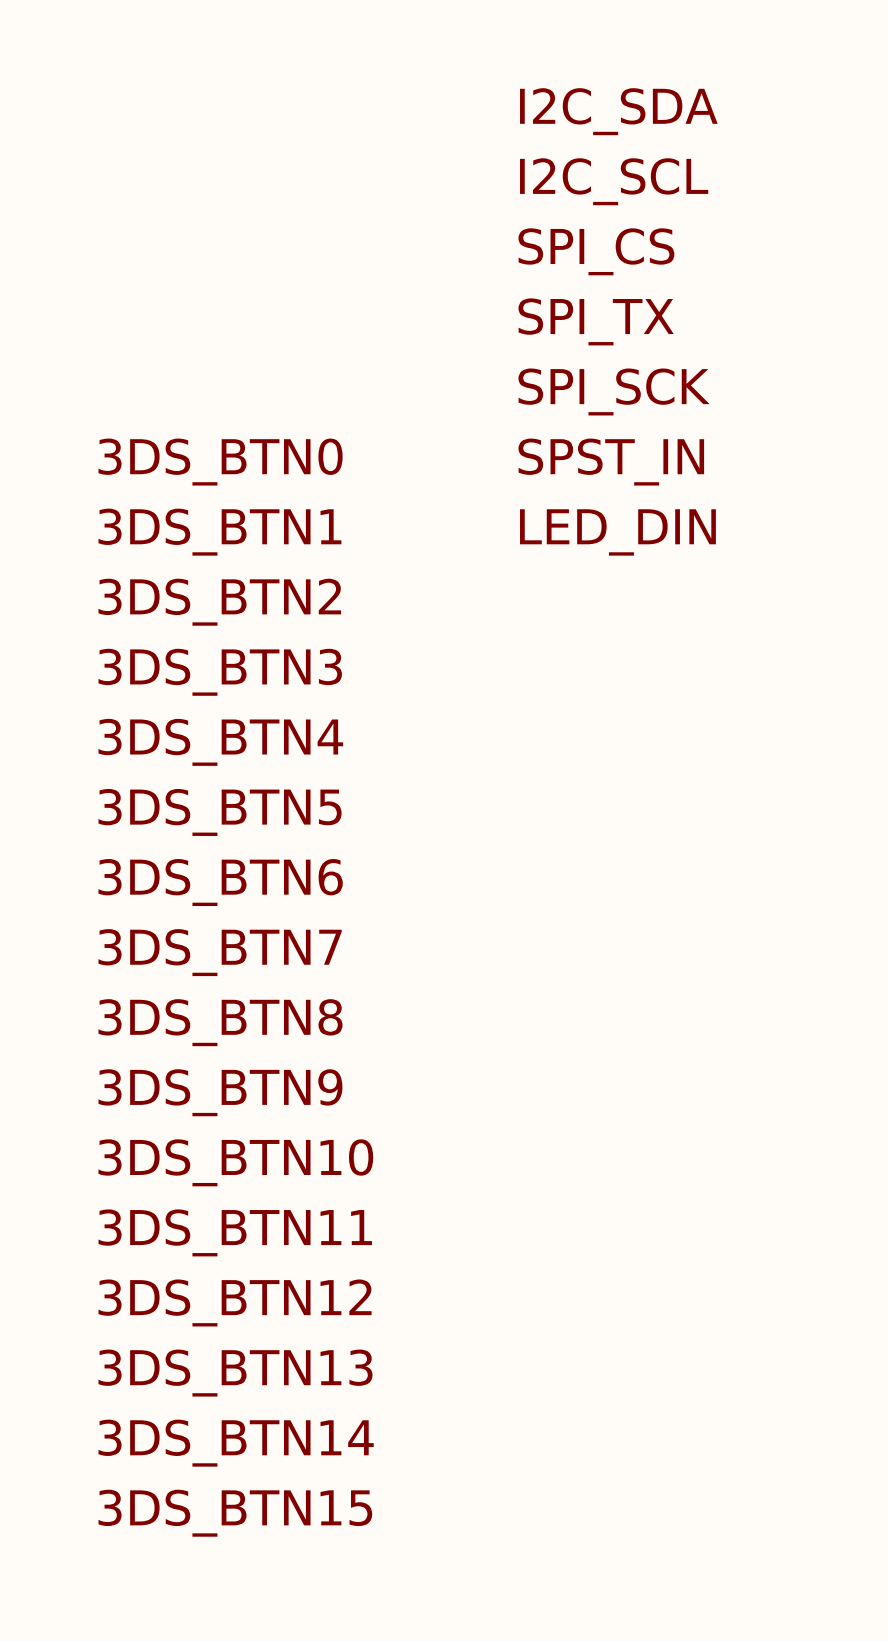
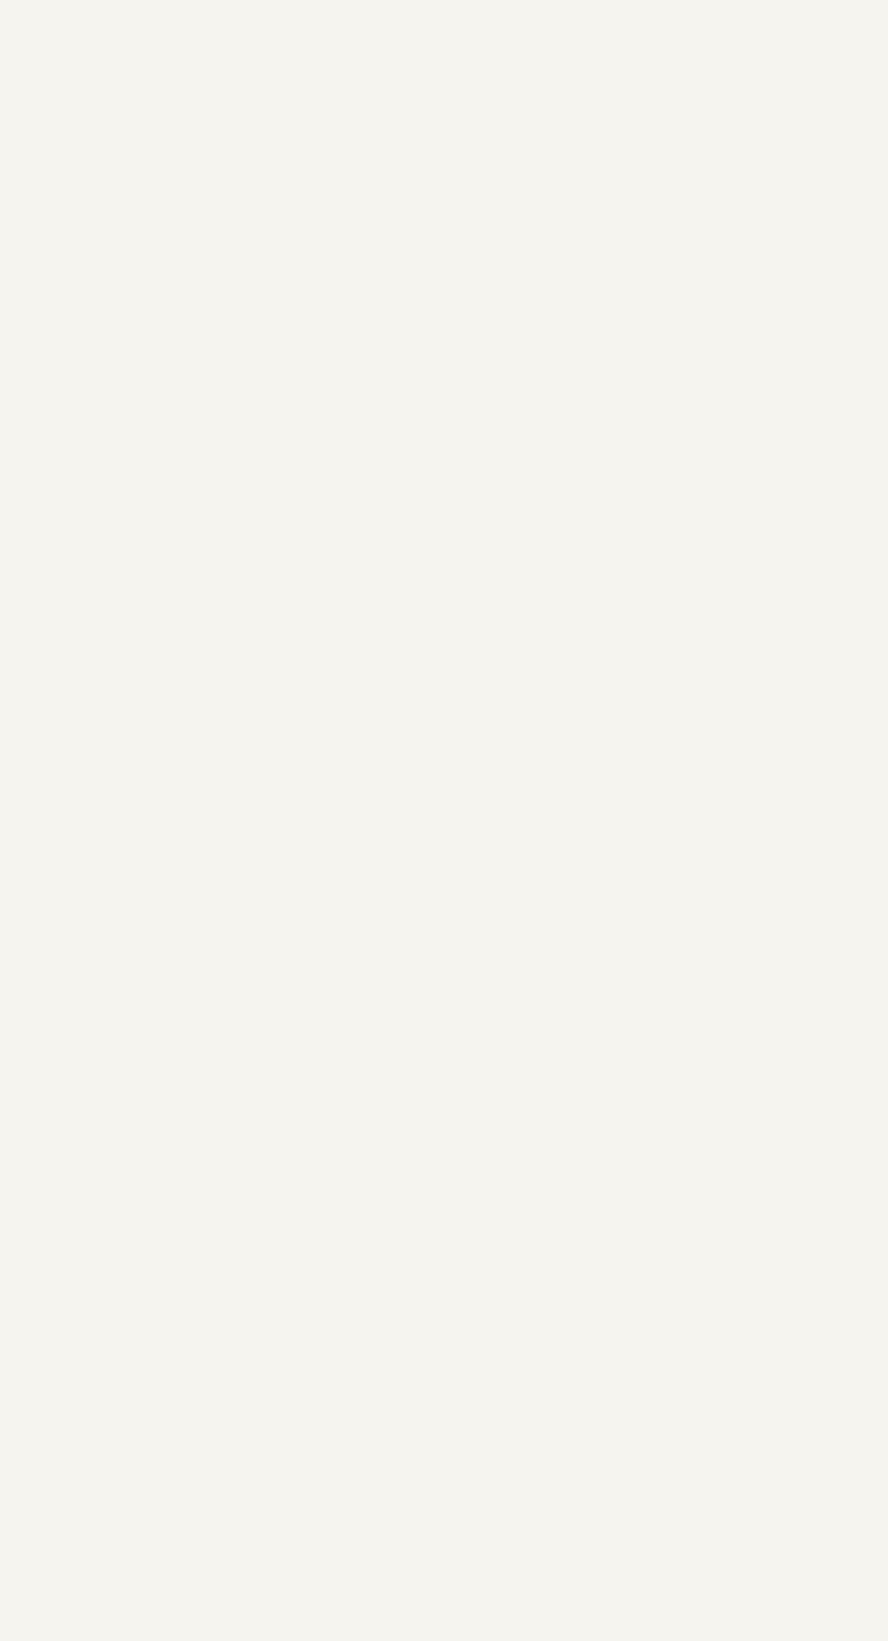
label: I2C_SDA (618, 111) -> none
label: I2C_SCL (614, 181) -> none
label: SPI_CS (596, 251) -> none
label: SPI_TX (596, 321) -> none
label: SPI_SCK (614, 391) -> none
label: 3DS_BTN0 (220, 462) -> none
label: SPST_IN (611, 462) -> none
label: 3DS_BTN1 (219, 532) -> none
label: LED_DIN (617, 532) -> none
label: 3DS_BTN2 (219, 602) -> none
label: 3DS_BTN3 (220, 672) -> none
label: 3DS_BTN4 (220, 742) -> none
label: 3DS_BTN5 (220, 812) -> none
label: 3DS_BTN6 (220, 882) -> none
label: 3DS_BTN7 (220, 952) -> none
label: 3DS_BTN8 (220, 1022) -> none
label: 3DS_BTN9 (220, 1092) -> none
label: 3DS_BTN10 (235, 1162) -> none
label: 3DS_BTN11 (235, 1232) -> none
label: 3DS_BTN12 (235, 1302) -> none
label: 3DS_BTN13 (235, 1373) -> none
label: 3DS_BTN14 (236, 1443) -> none
label: 3DS_BTN15 (235, 1513) -> none

